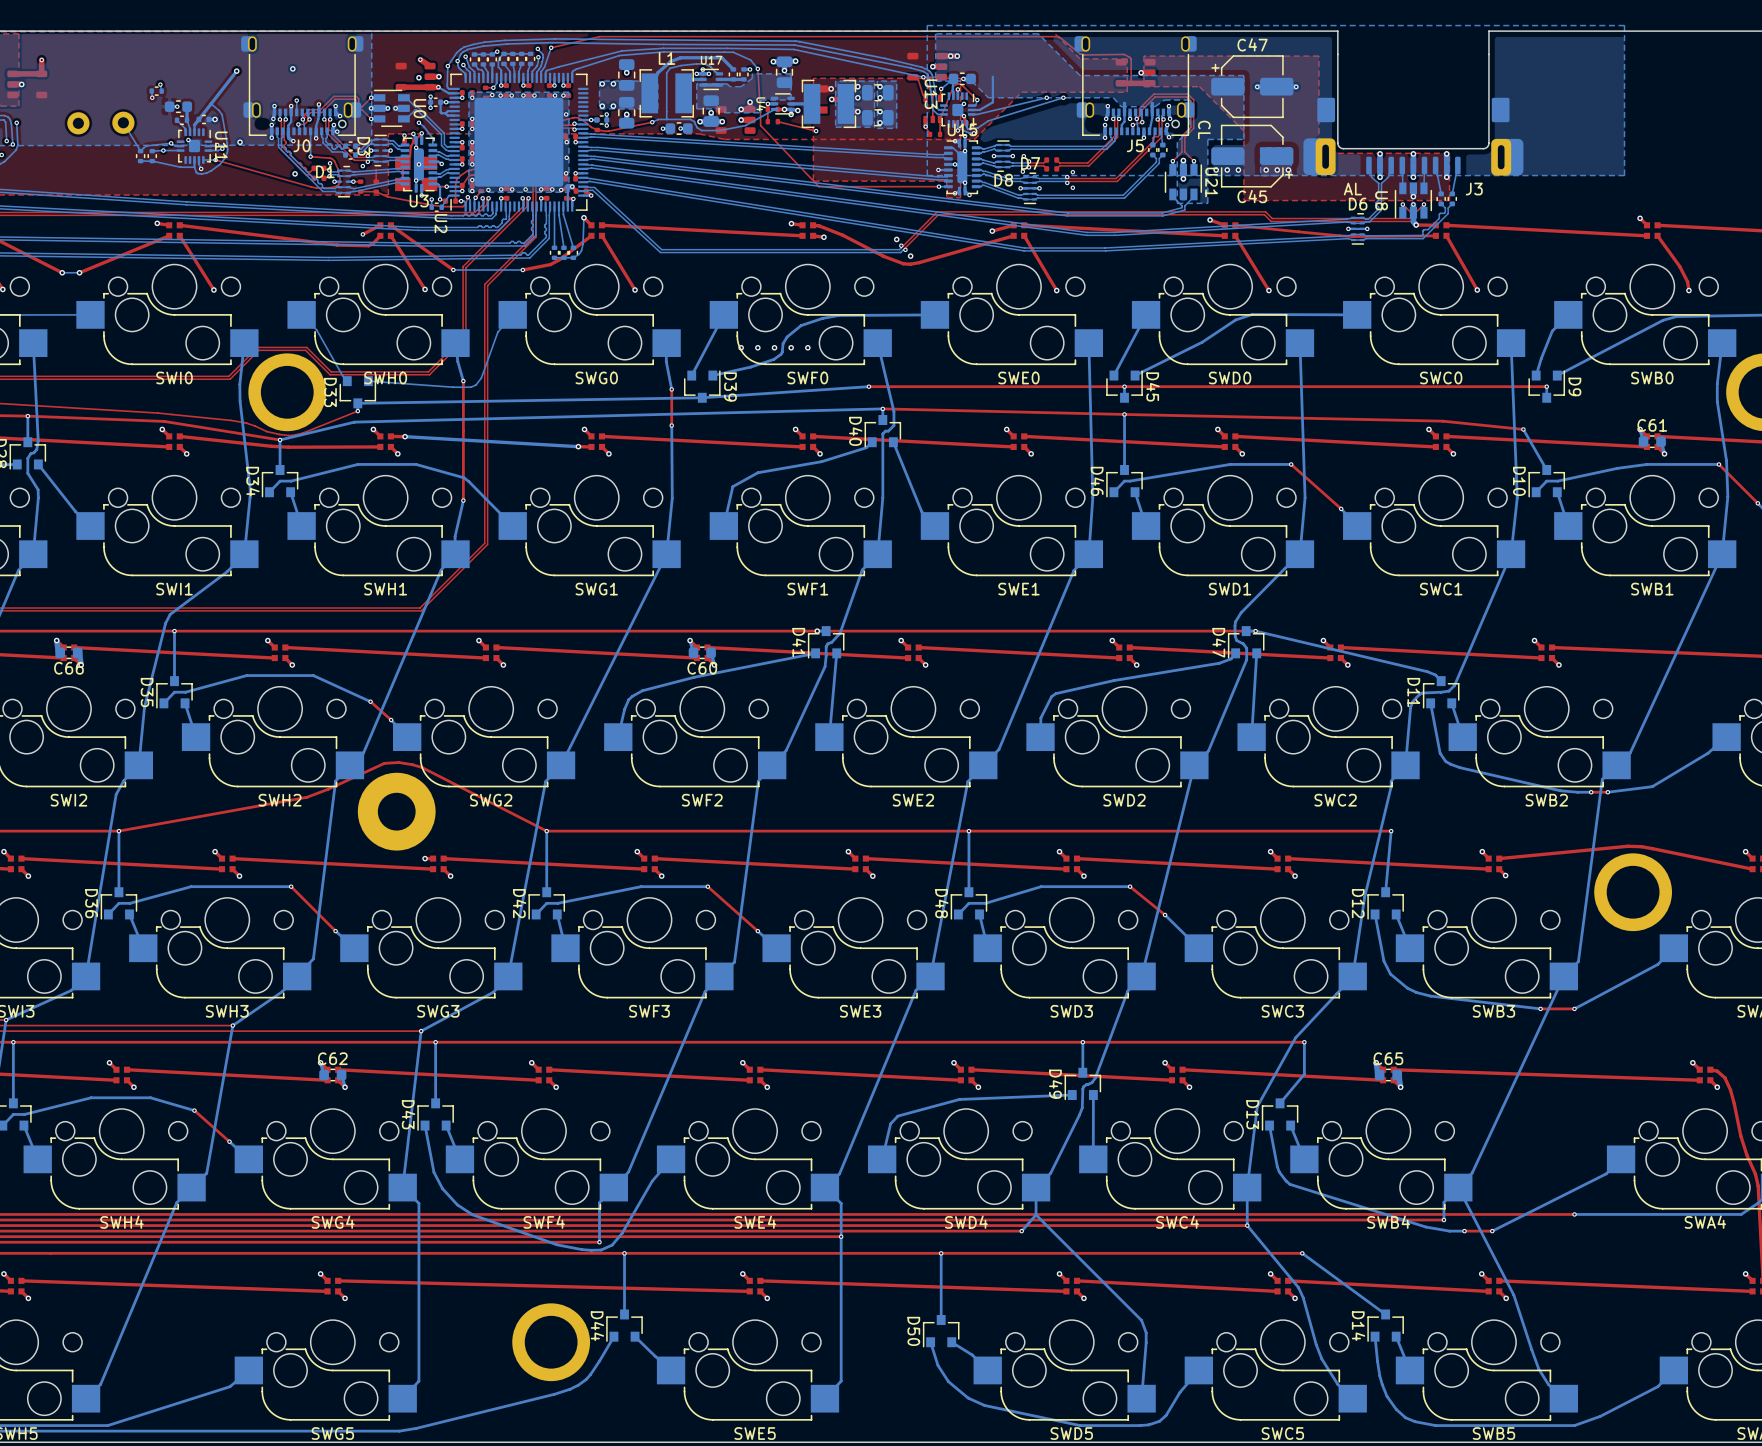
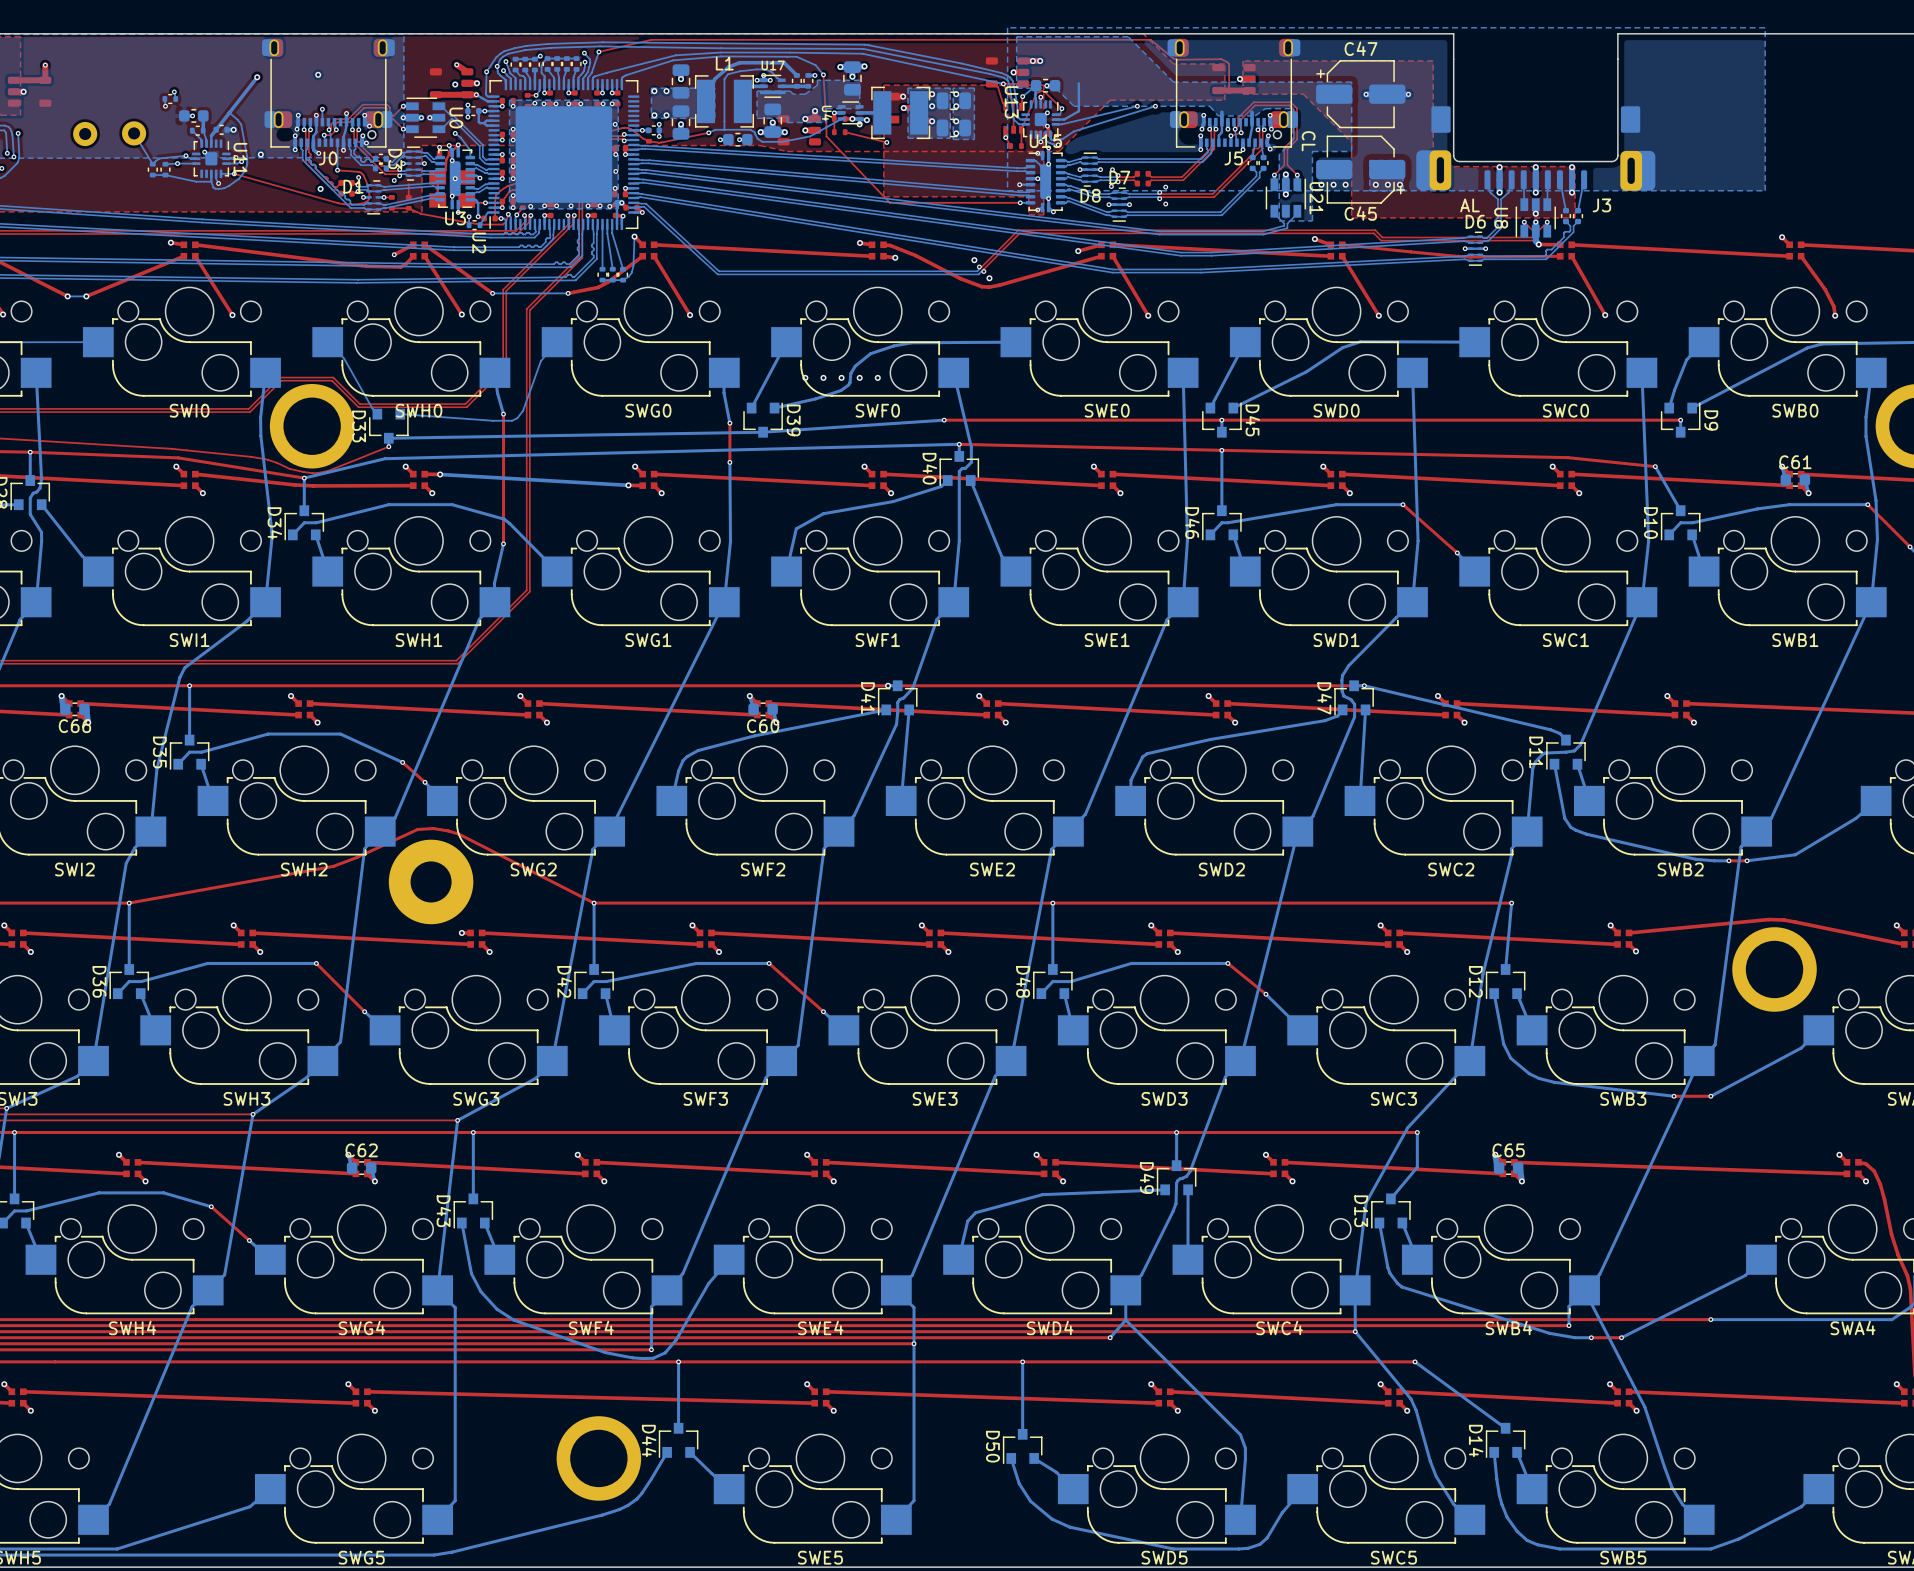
J0 footprint: [241, 36, 364, 136] -> [262, 38, 395, 148]
J5 footprint: [1074, 36, 1197, 136] -> [1167, 38, 1301, 148]

